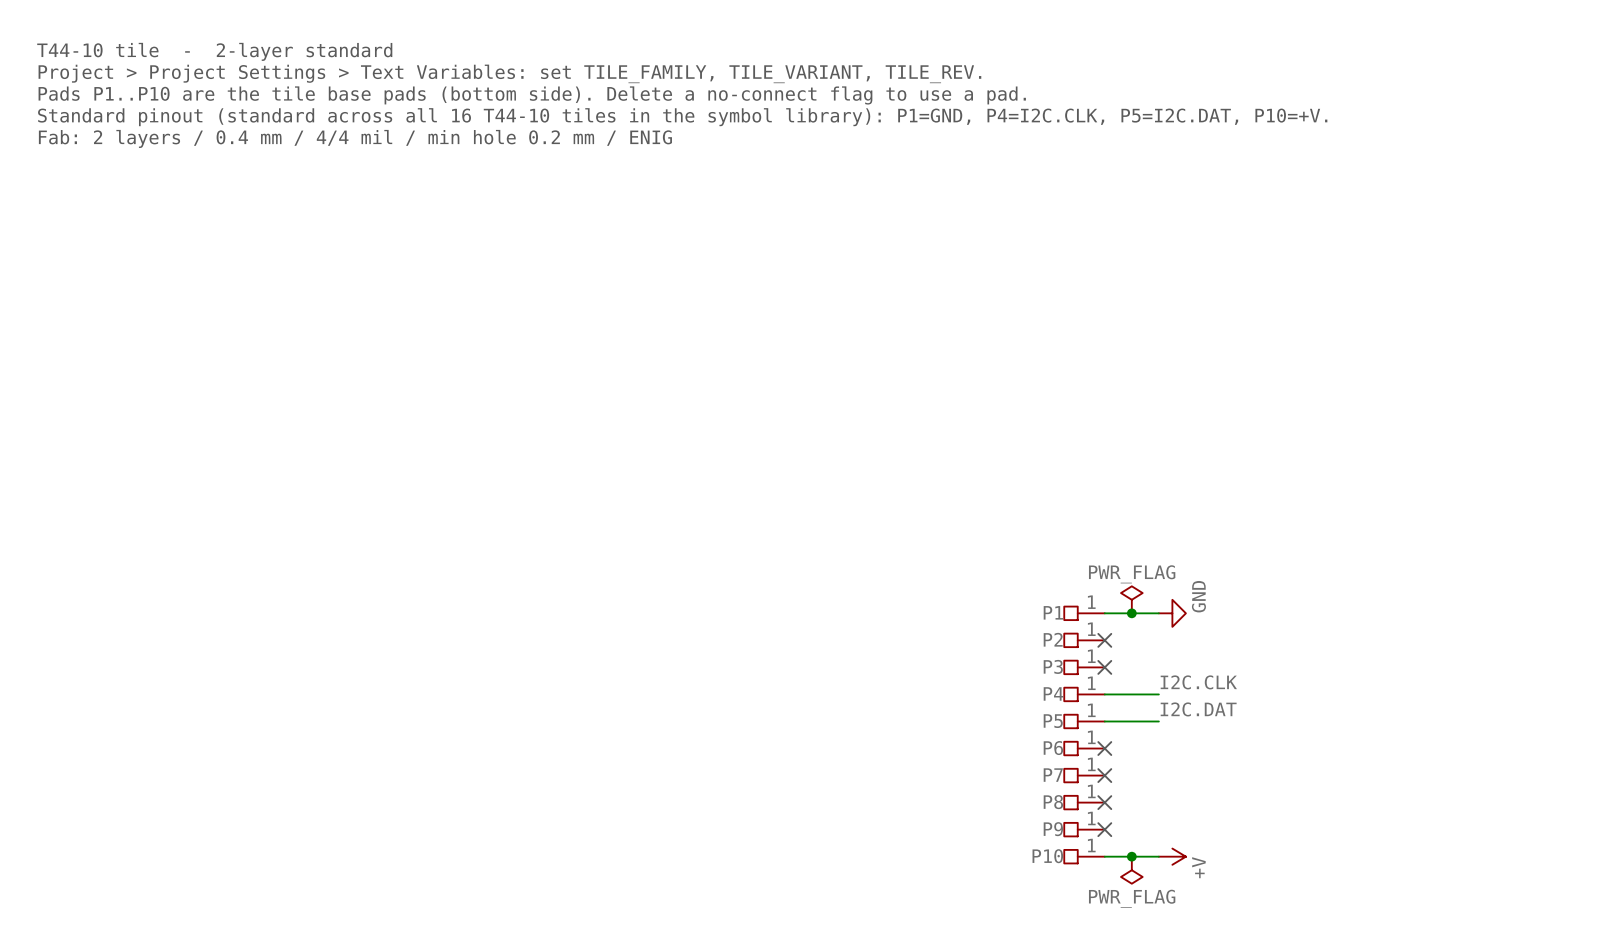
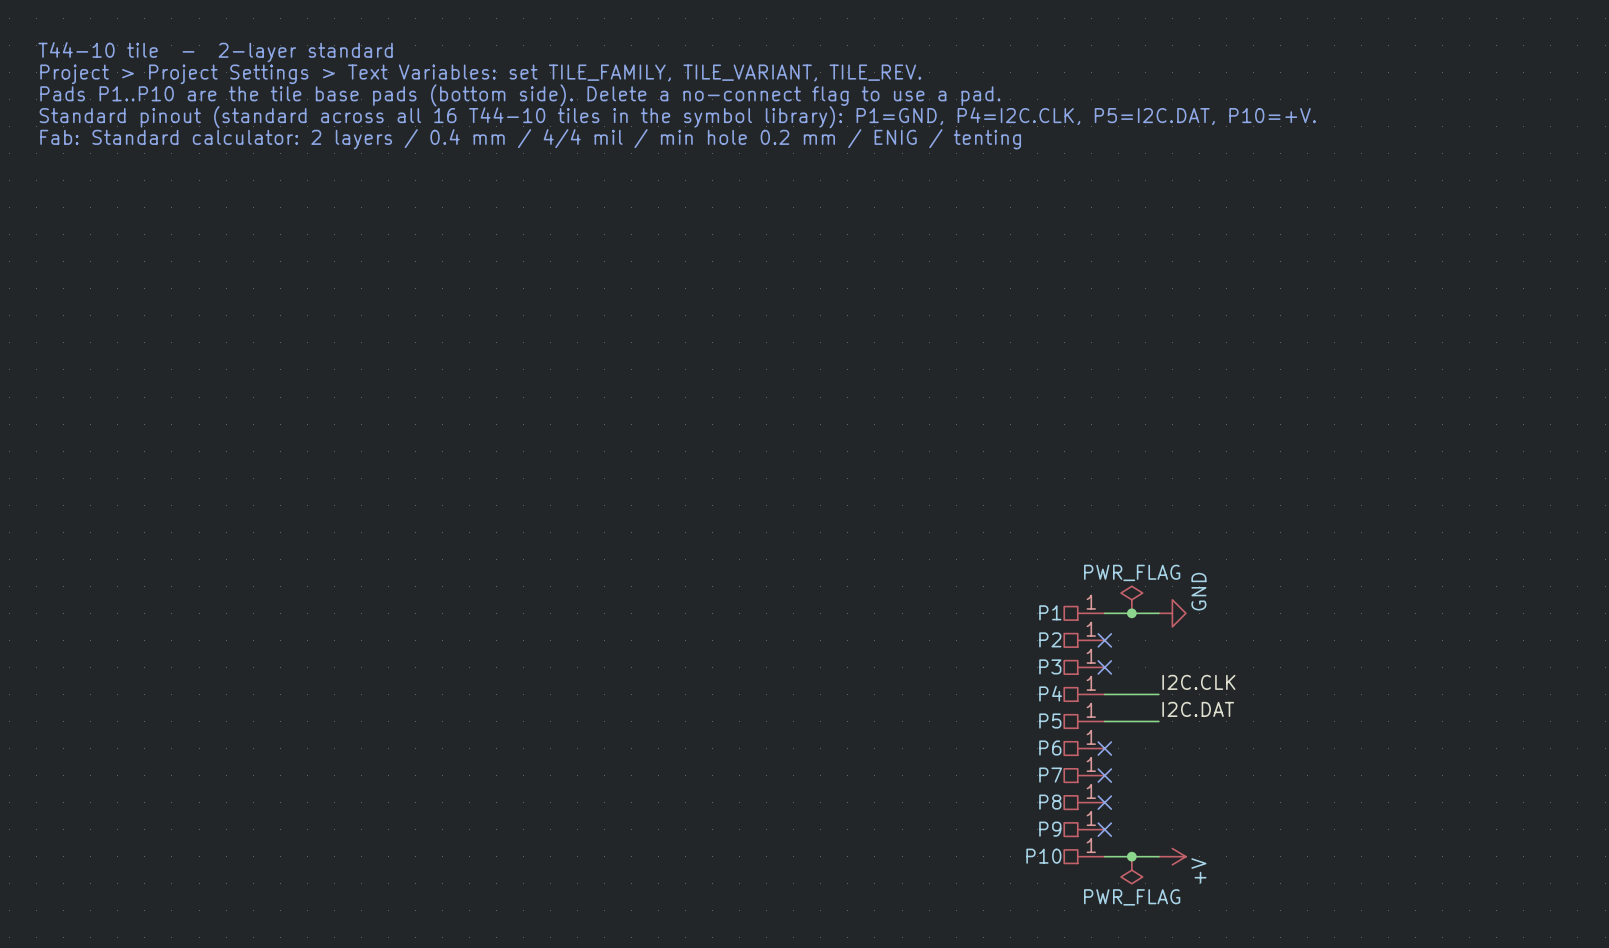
text: Fab: 2 layers / 0.4 mm / 4/4 mil / min hole 0.2 mm / ENIG (355, 138) -> Fab: Standard calculator: 2 layers / 0.4 mm / 4/4 mil / min hole 0.2 mm / ENIG / tenting (530, 139)

